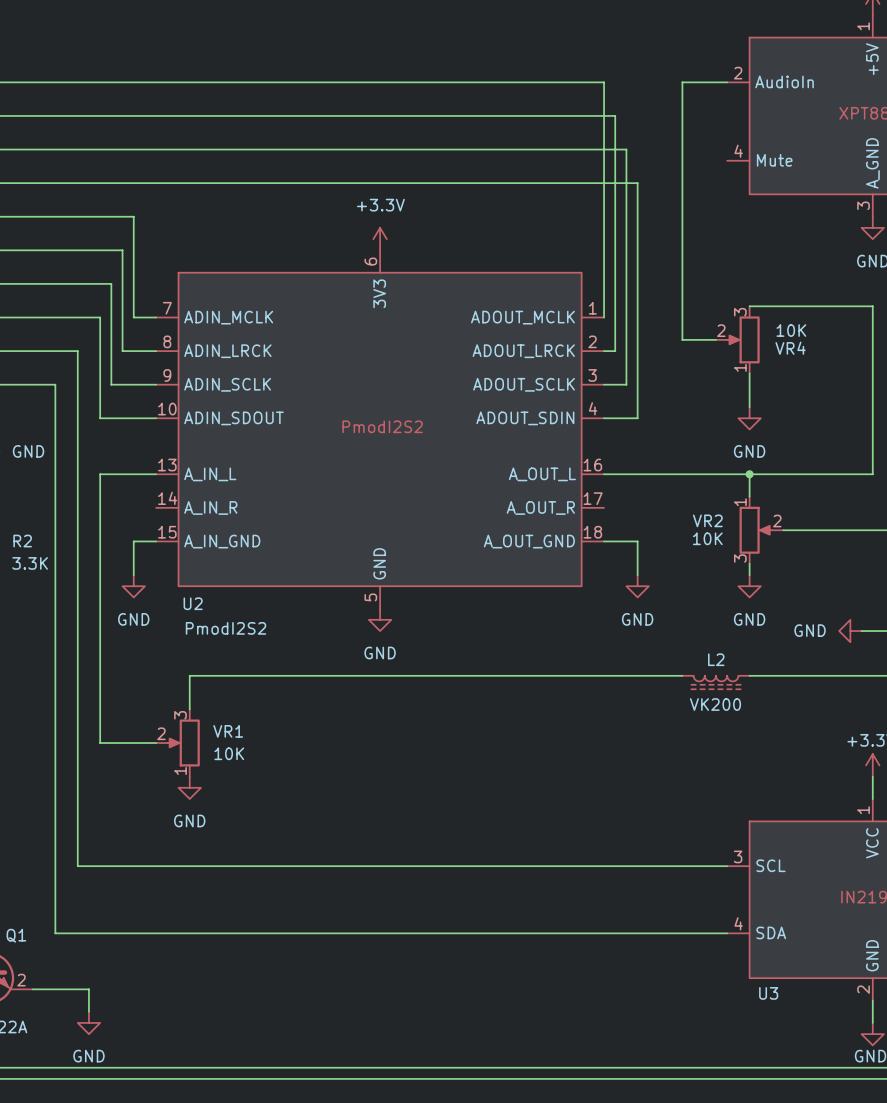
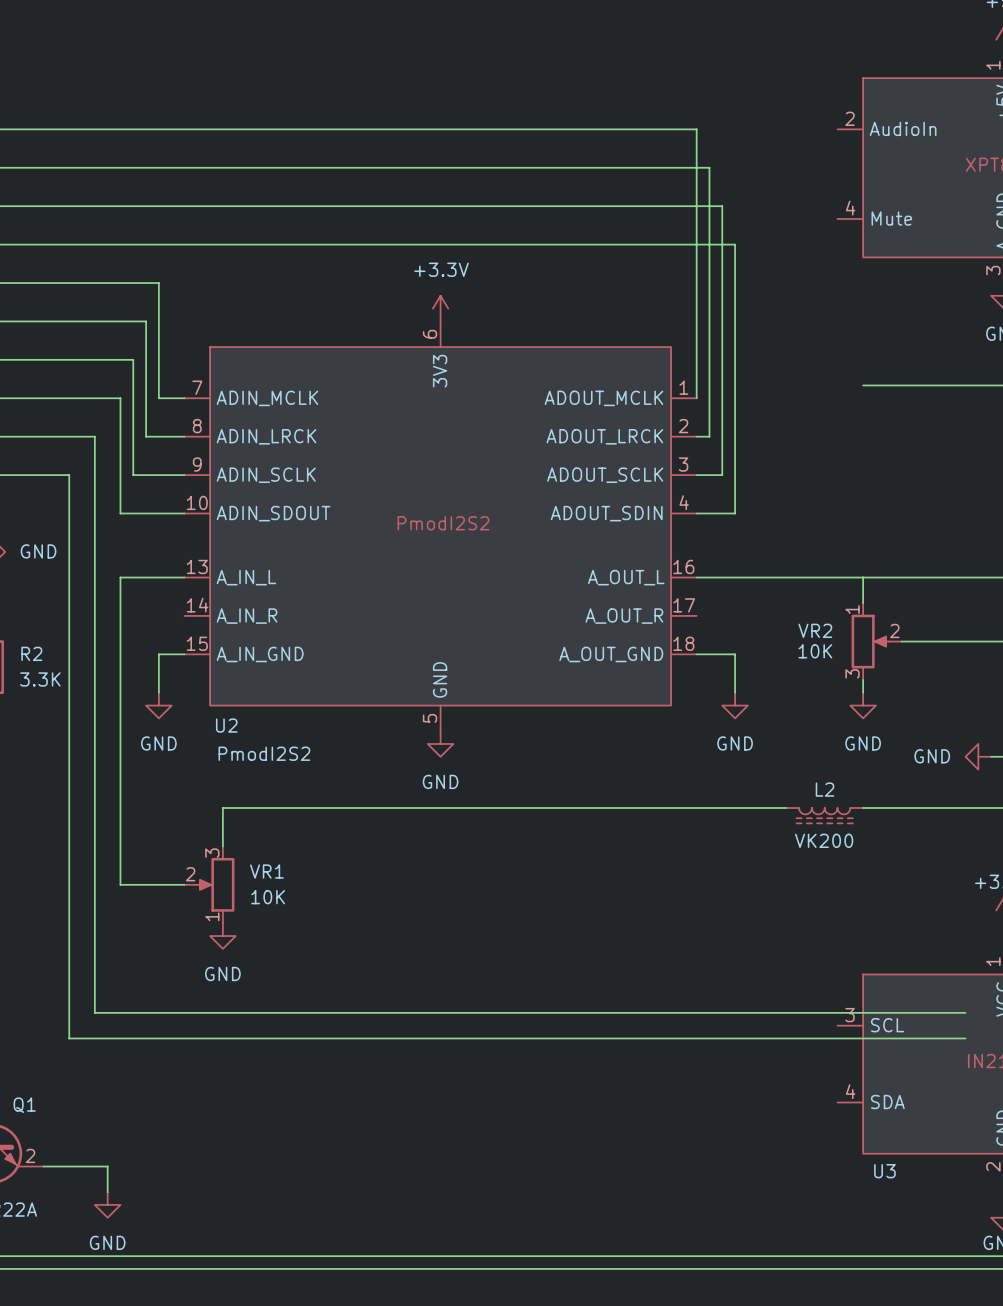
wire: (727, 82) (682, 82) (682, 339) (716, 339) -> none
VR4: 10K (737, 339) -> none
wire: (749, 373) (749, 407) -> none
power symbol: GND (749, 418) -> none
junction: (749, 474) -> none
wire: (77, 854) (77, 866) (727, 866) -> (94, 1012) (965, 1012)
wire: (55, 877) (55, 933) (727, 933) -> (69, 1038) (965, 1038)

